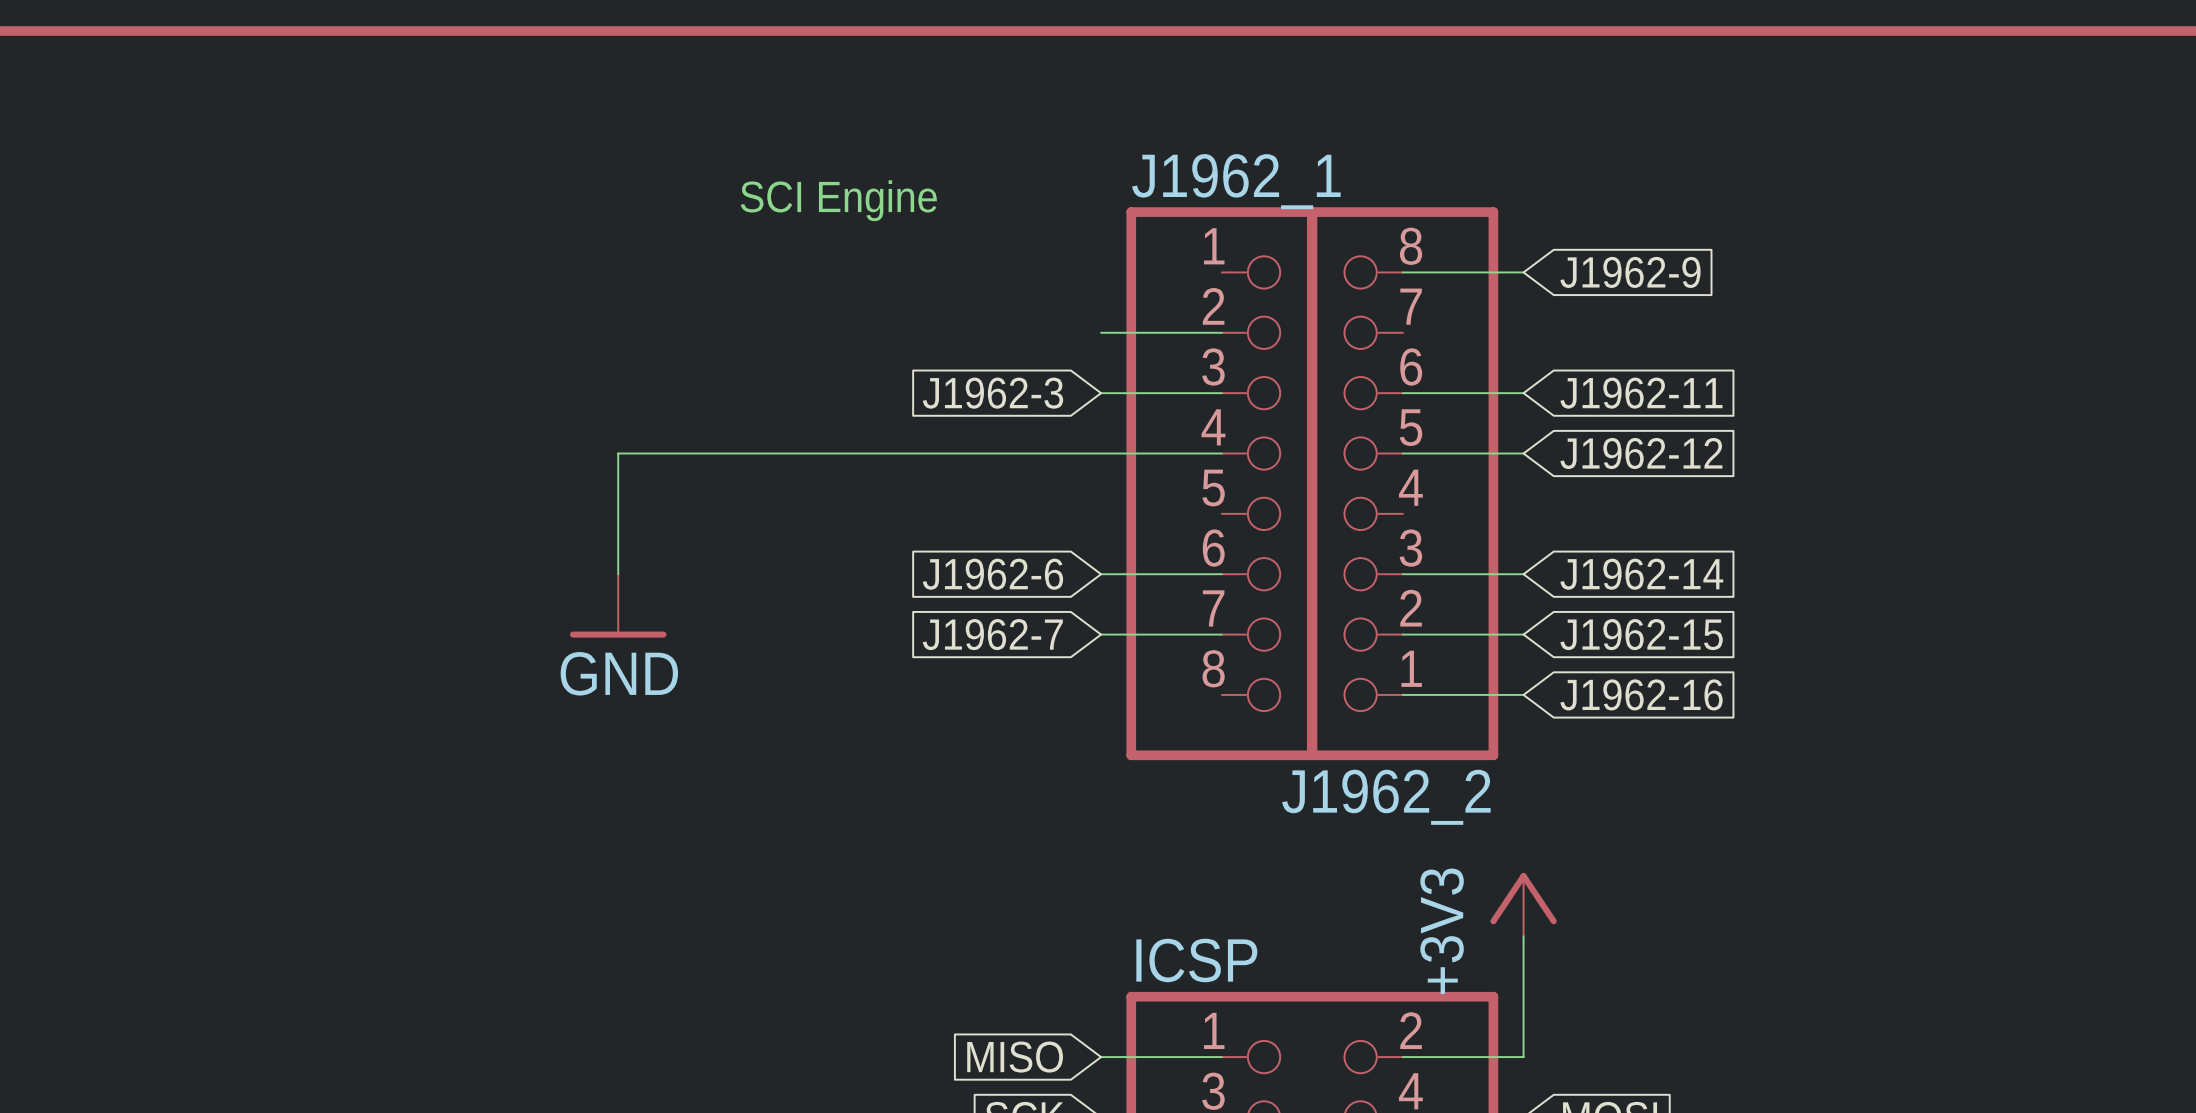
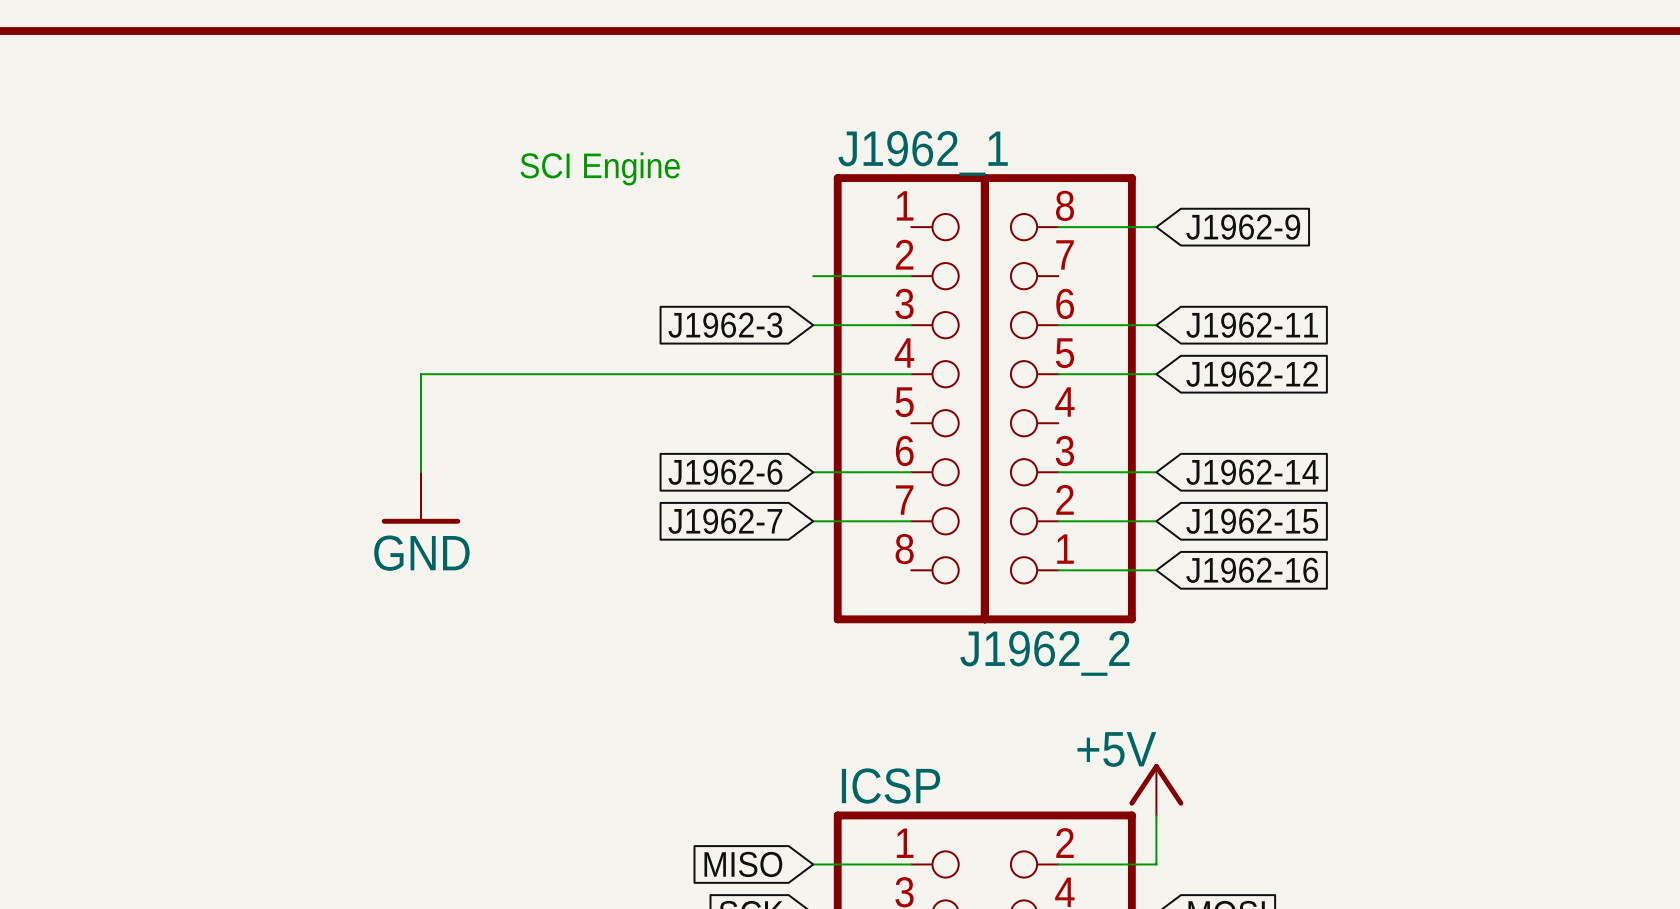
power symbol: +3V3 (1523, 904) -> none
power symbol: none -> +5V (1156, 789)

